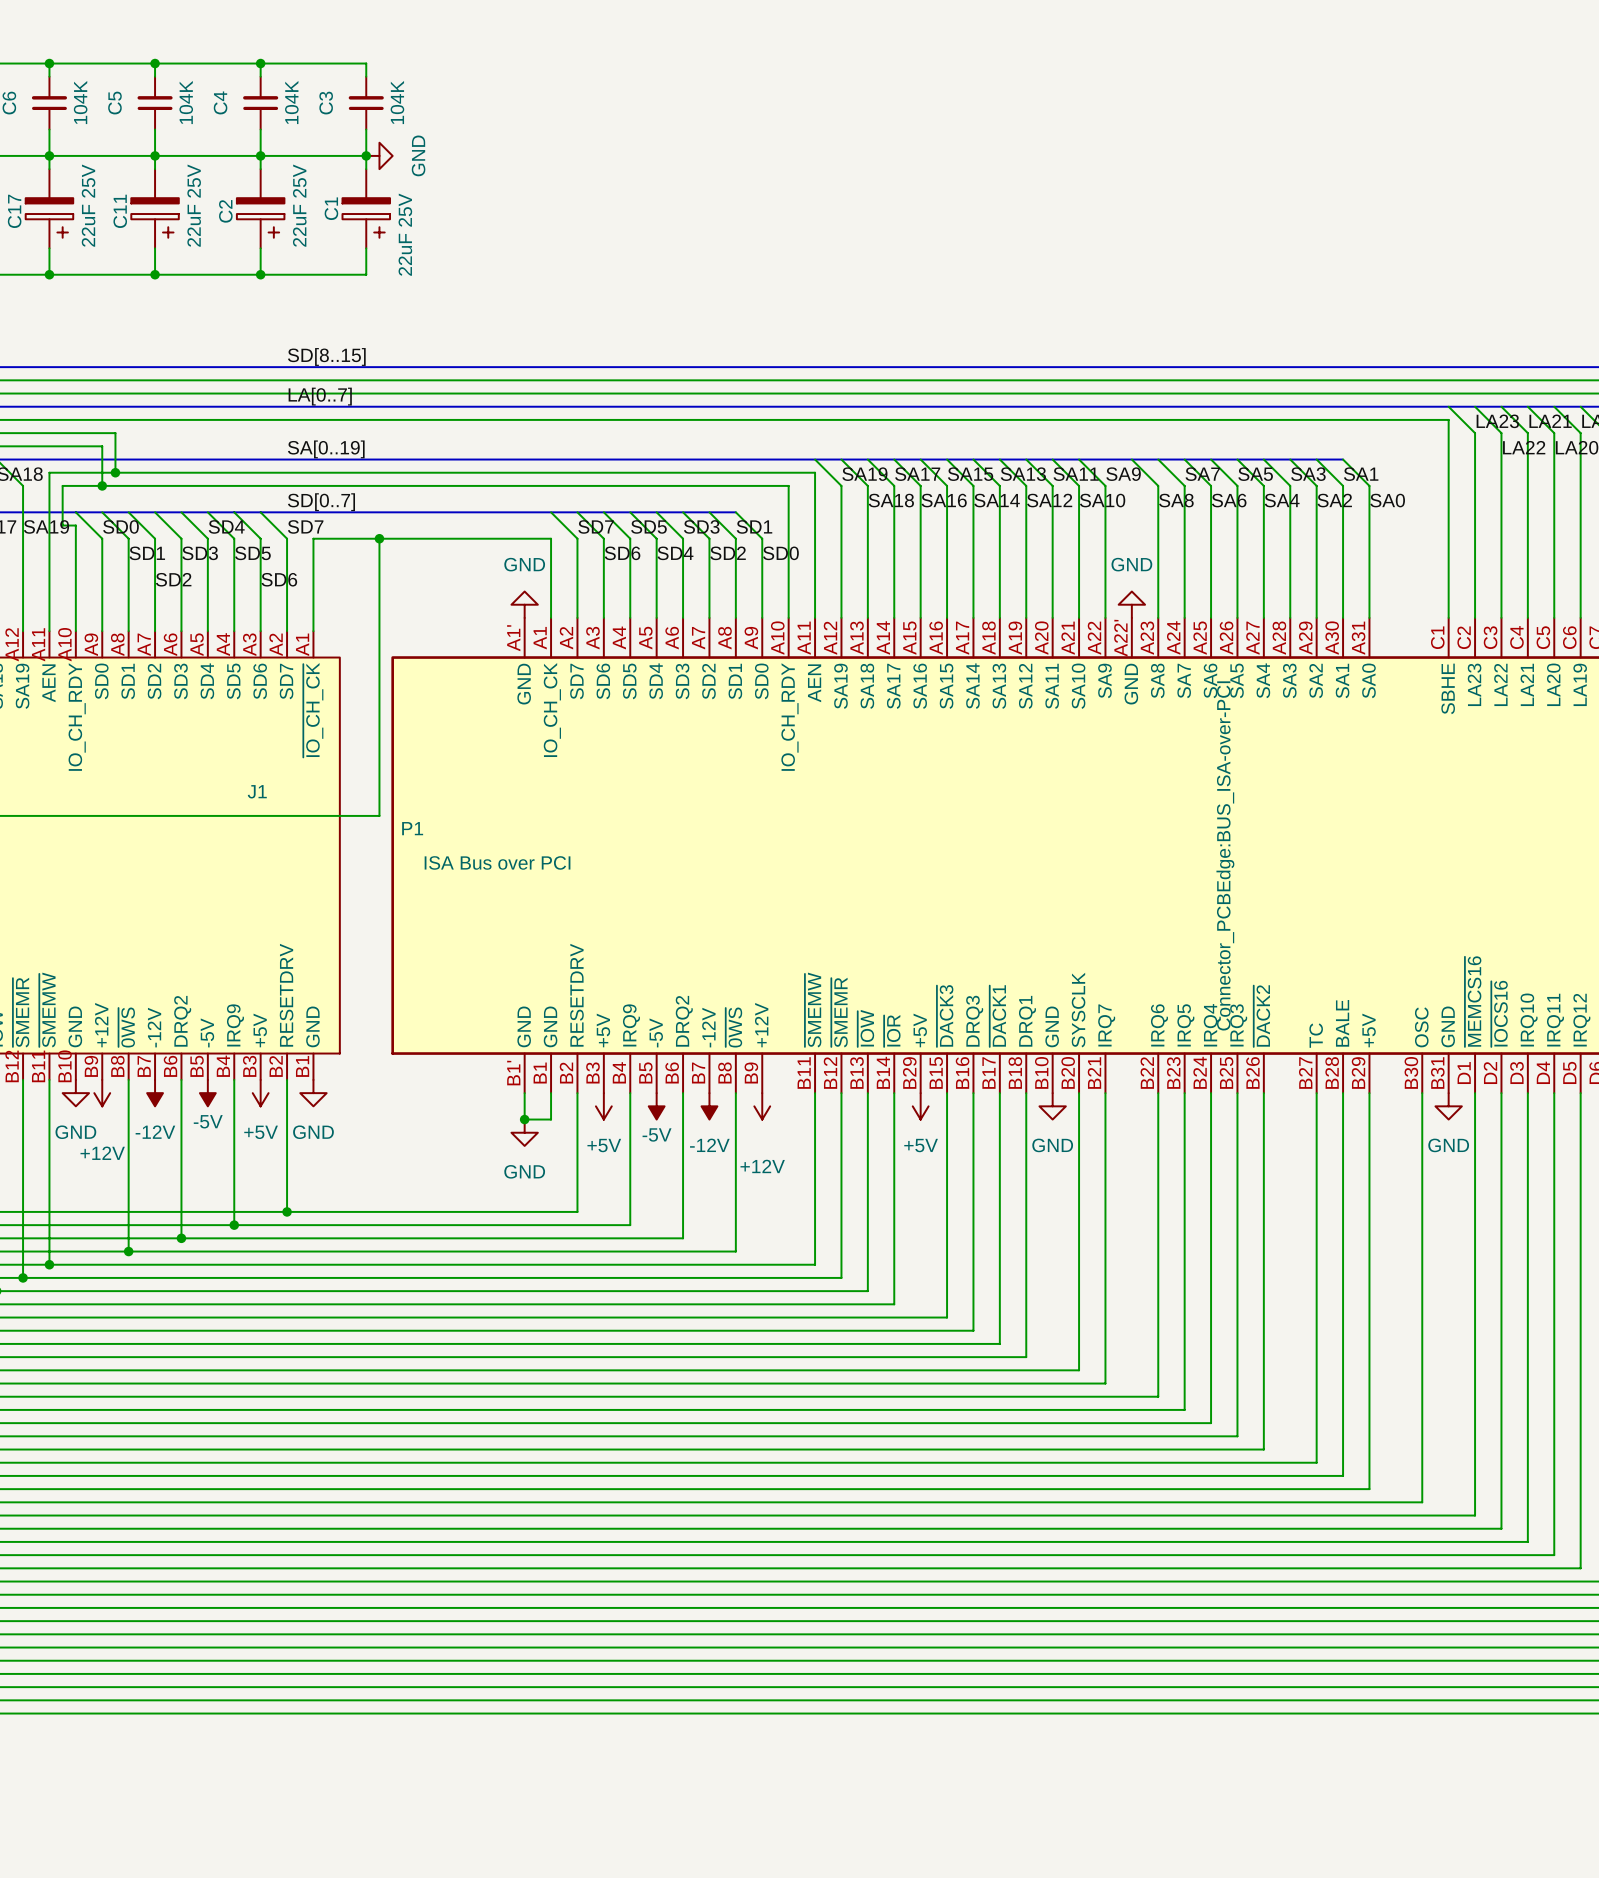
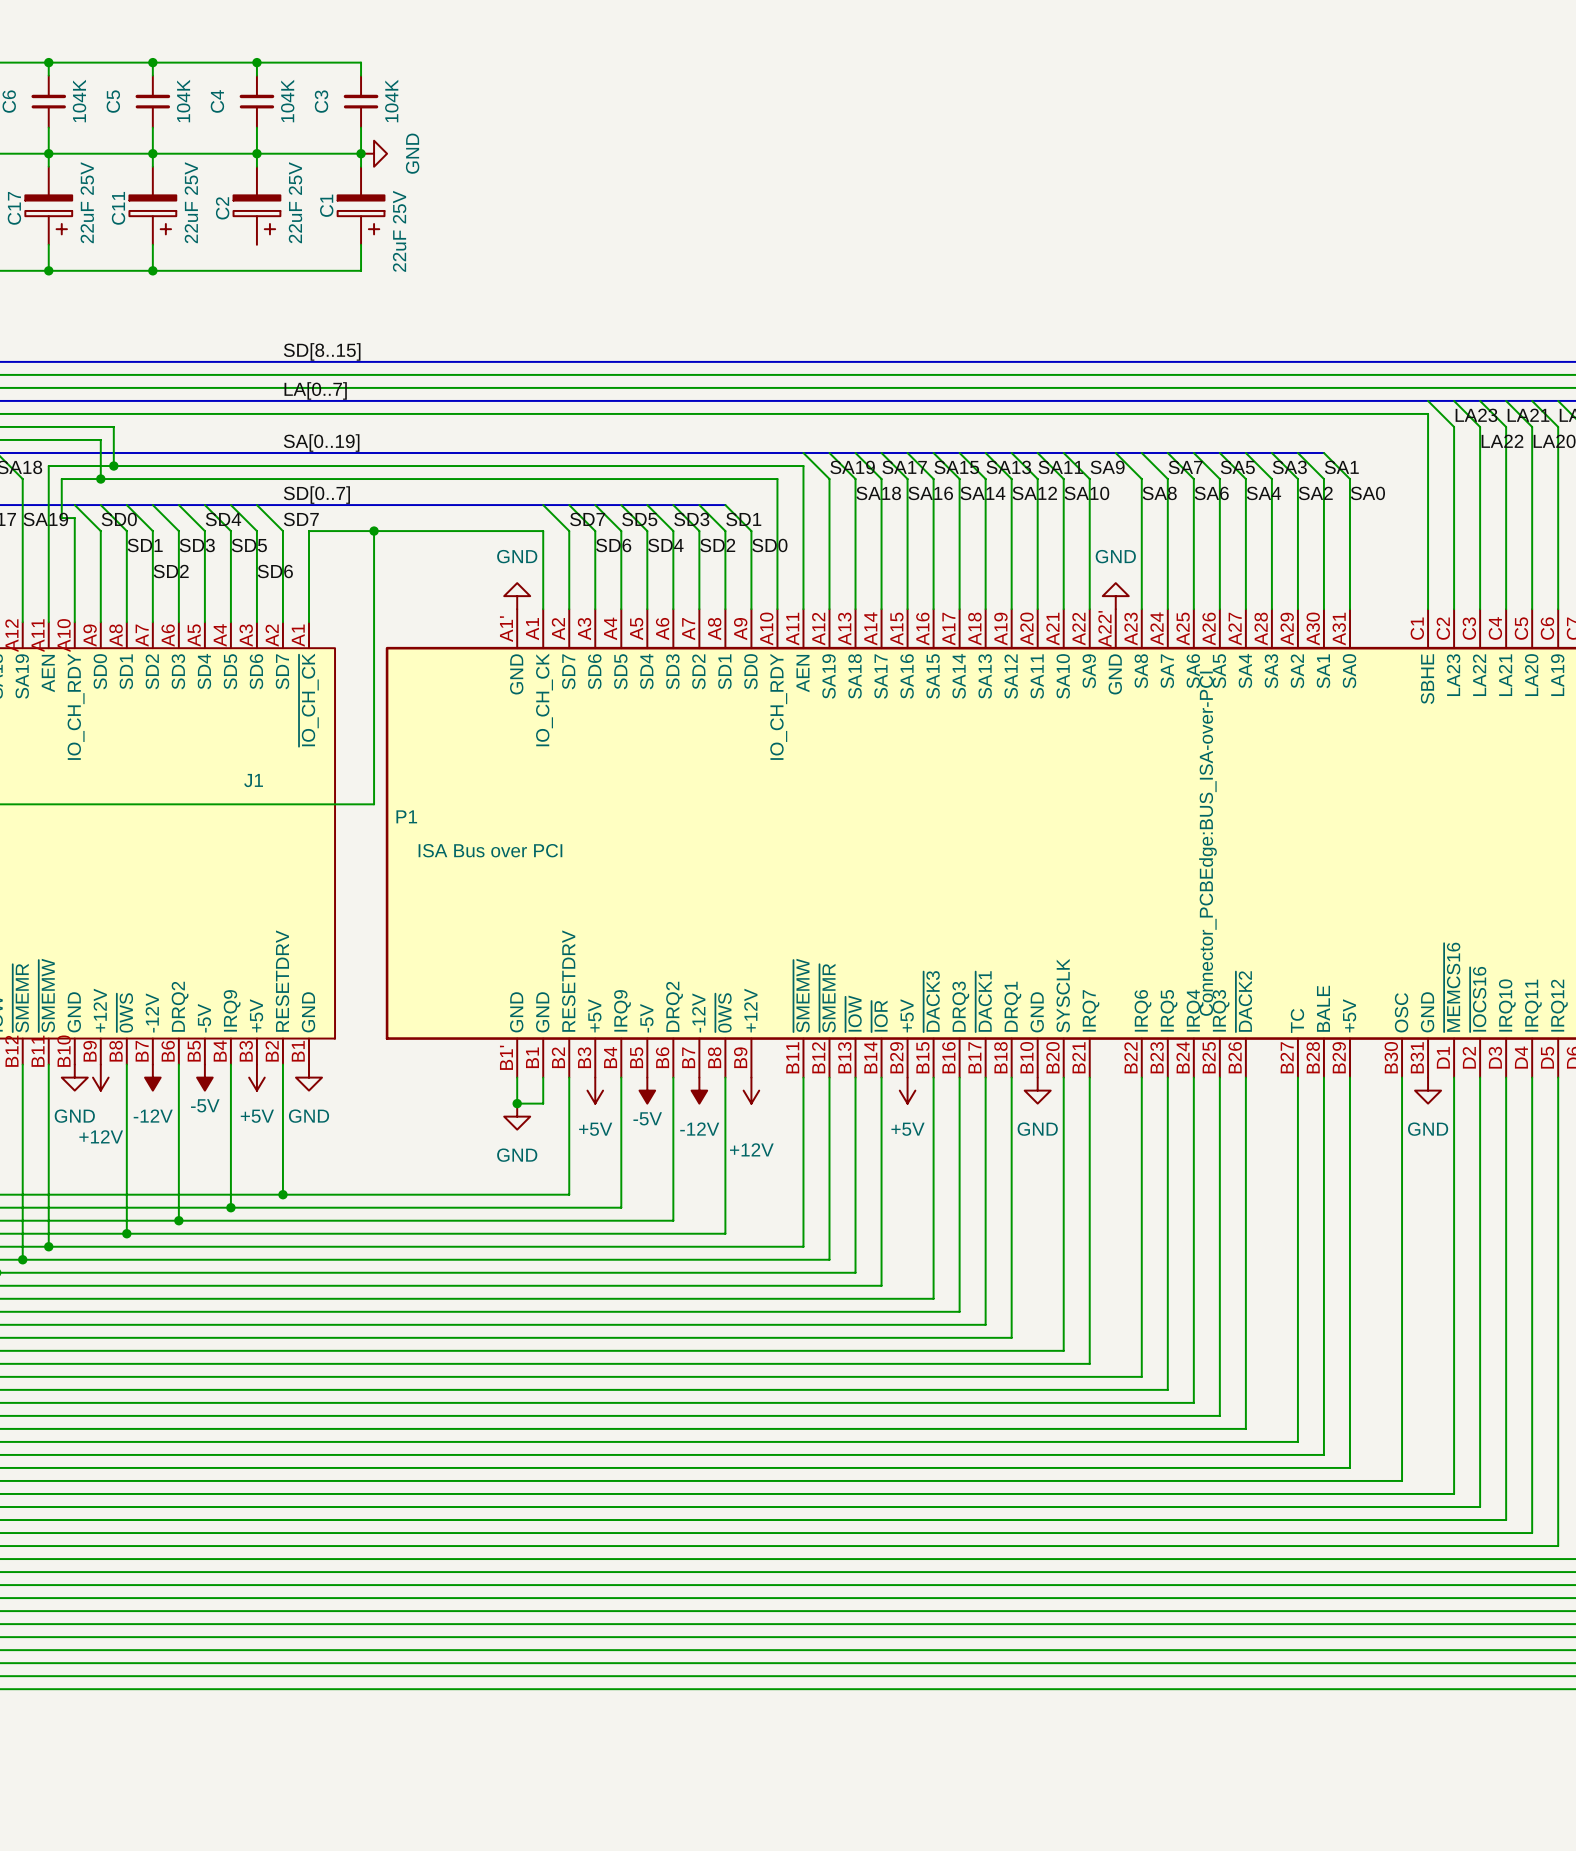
wire: (260, 248) (260, 274) -> none
junction: (260, 274) -> none

